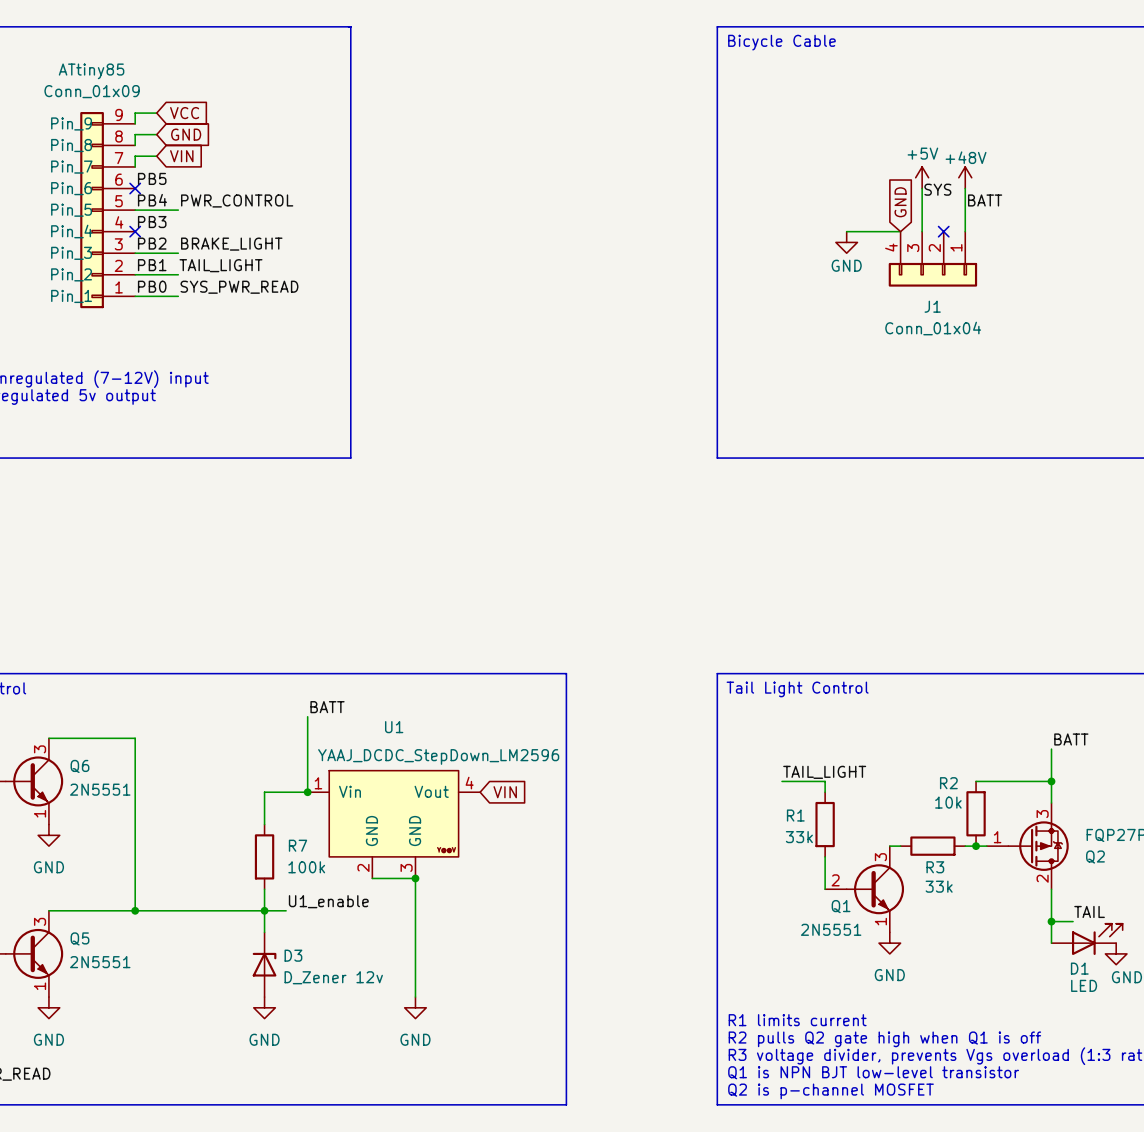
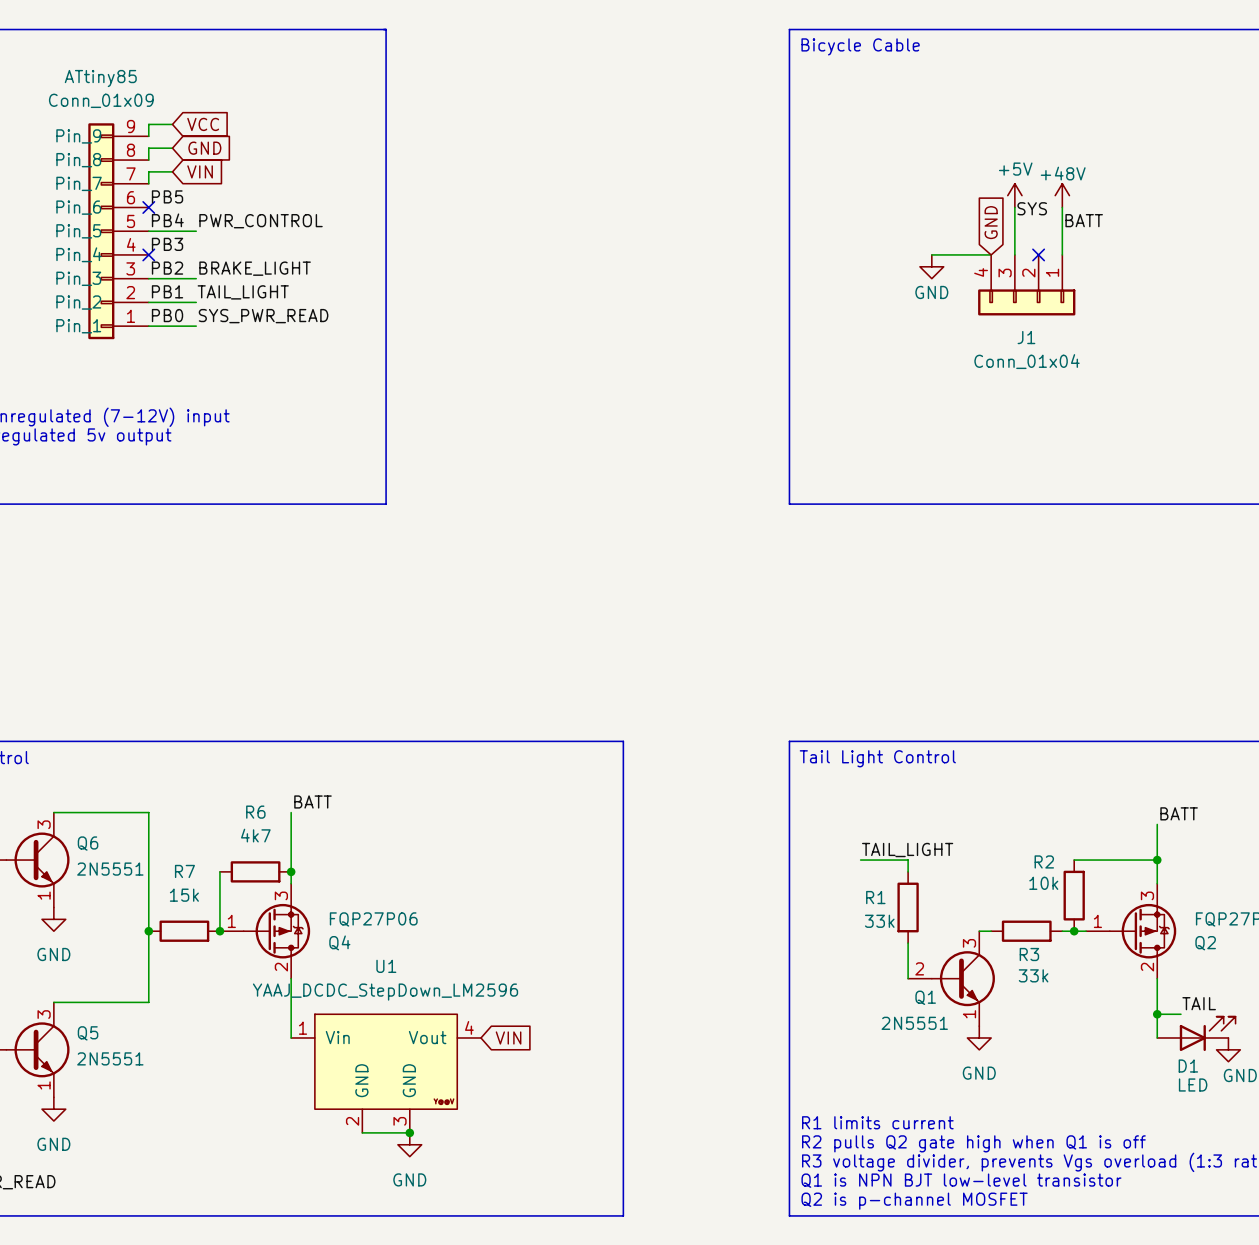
label position: BATT (327, 707) -> BATT (313, 801)
wire: (307, 716) (307, 792) (264, 792) -> (291, 812) (291, 871)
U1 value position: YAAJ_DCDC_StepDown_LM2596 (438, 756) -> YAAJ_DCDC_StepDown_LM2596 (385, 992)
wire: none -> (219, 871) (219, 931)
R6: none -> 4k7 (255, 871)
junction position: (307, 792) -> (291, 871)
global label position: VIN (505, 792) -> VIN (508, 1037)
U1 position: (393, 824) -> (386, 1073)
R7 name position: R7 (298, 845) -> R7 (184, 871)
junction: none -> (148, 931)
junction: none -> (219, 931)
Q4: none -> FQP27P06 (265, 931)
R7 rotation: 0° (264, 856) -> 90° clockwise (184, 931)
R7 position: (264, 856) -> (184, 931)
R7 value: 100k (306, 867) -> 15k (184, 895)
wire: (372, 878) (415, 878) (415, 997) -> none
junction: (415, 878) -> none
label: U1_enable (328, 901) -> none
wire: (135, 910) (286, 910) -> none
junction: (135, 910) -> none
junction: (264, 910) -> none
D3: D_Zener 12v (264, 964) -> none
power symbol: GND (264, 1007) -> none
power symbol position: GND (415, 1007) -> GND (409, 1144)
wire: none -> (362, 1132) (409, 1132)
junction: none -> (409, 1132)

